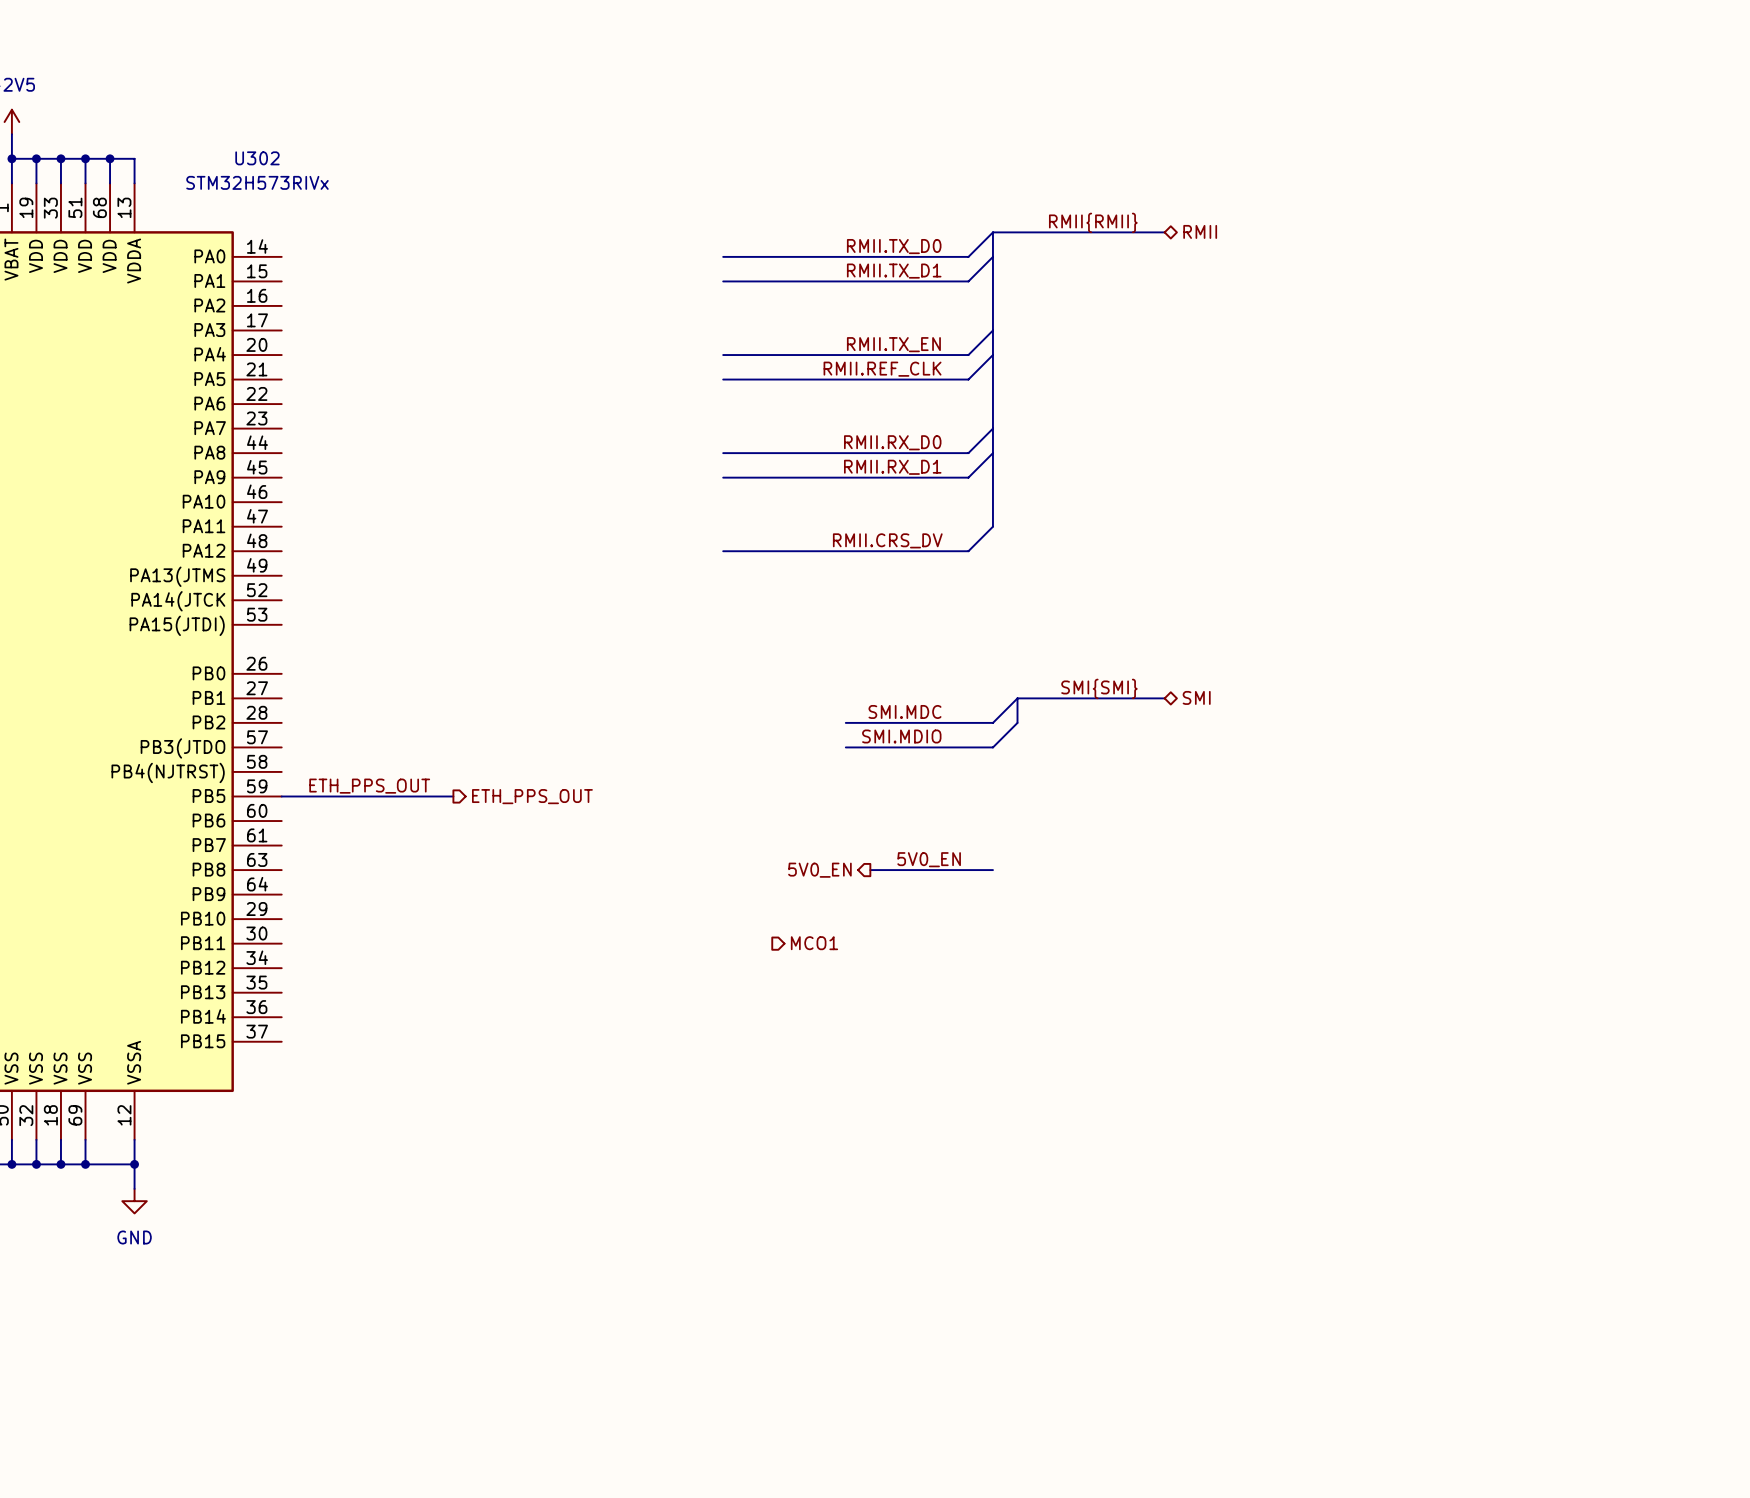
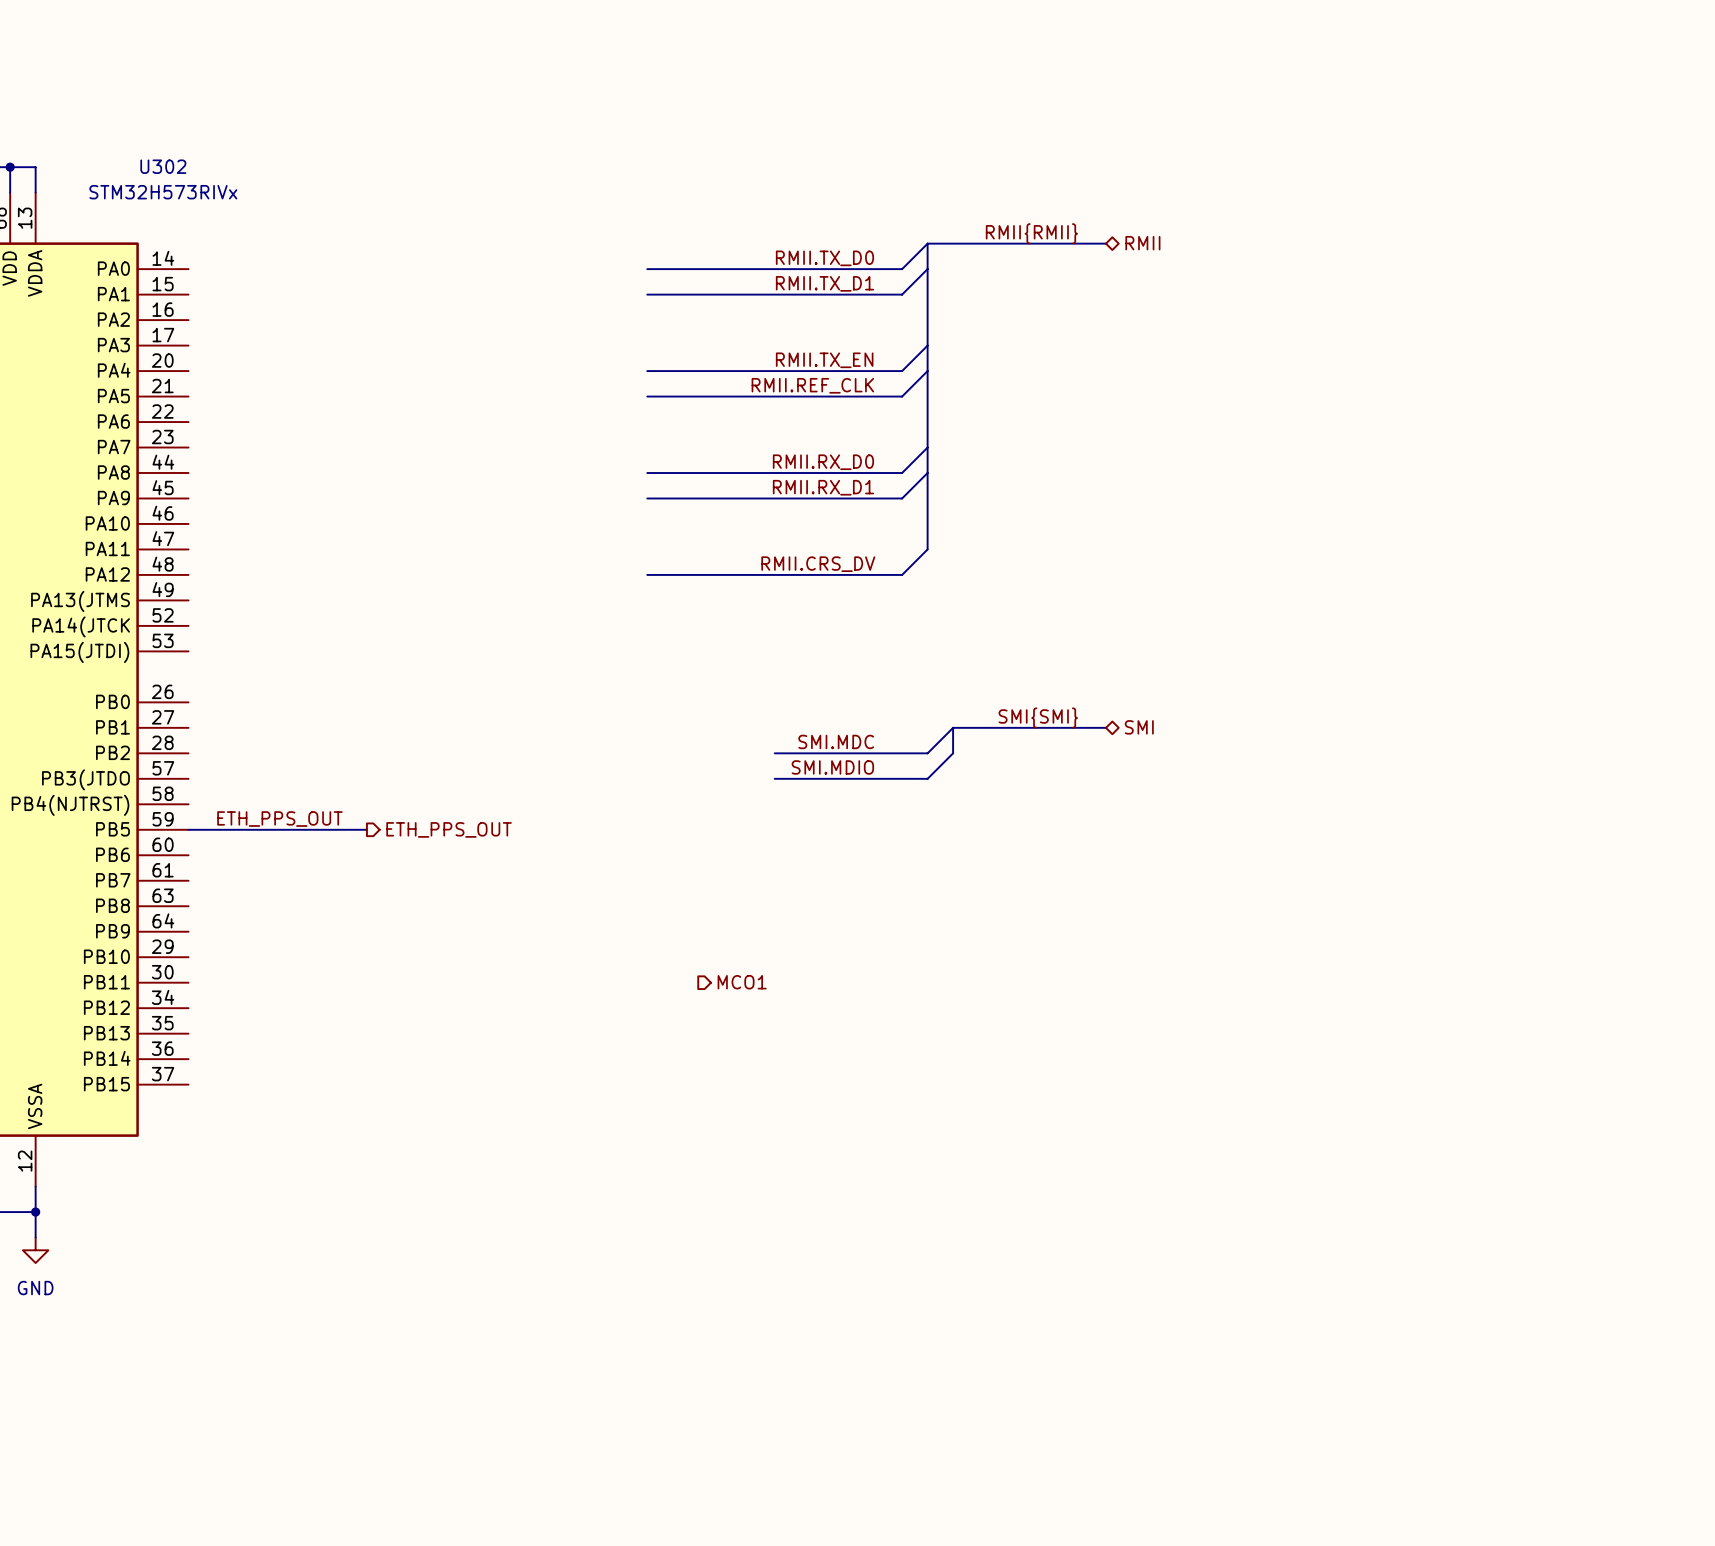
label: 5V0_EN (929, 859) -> none
hierarchical label: 5V0_EN (819, 870) -> none
wire: (870, 870) (992, 870) -> none

